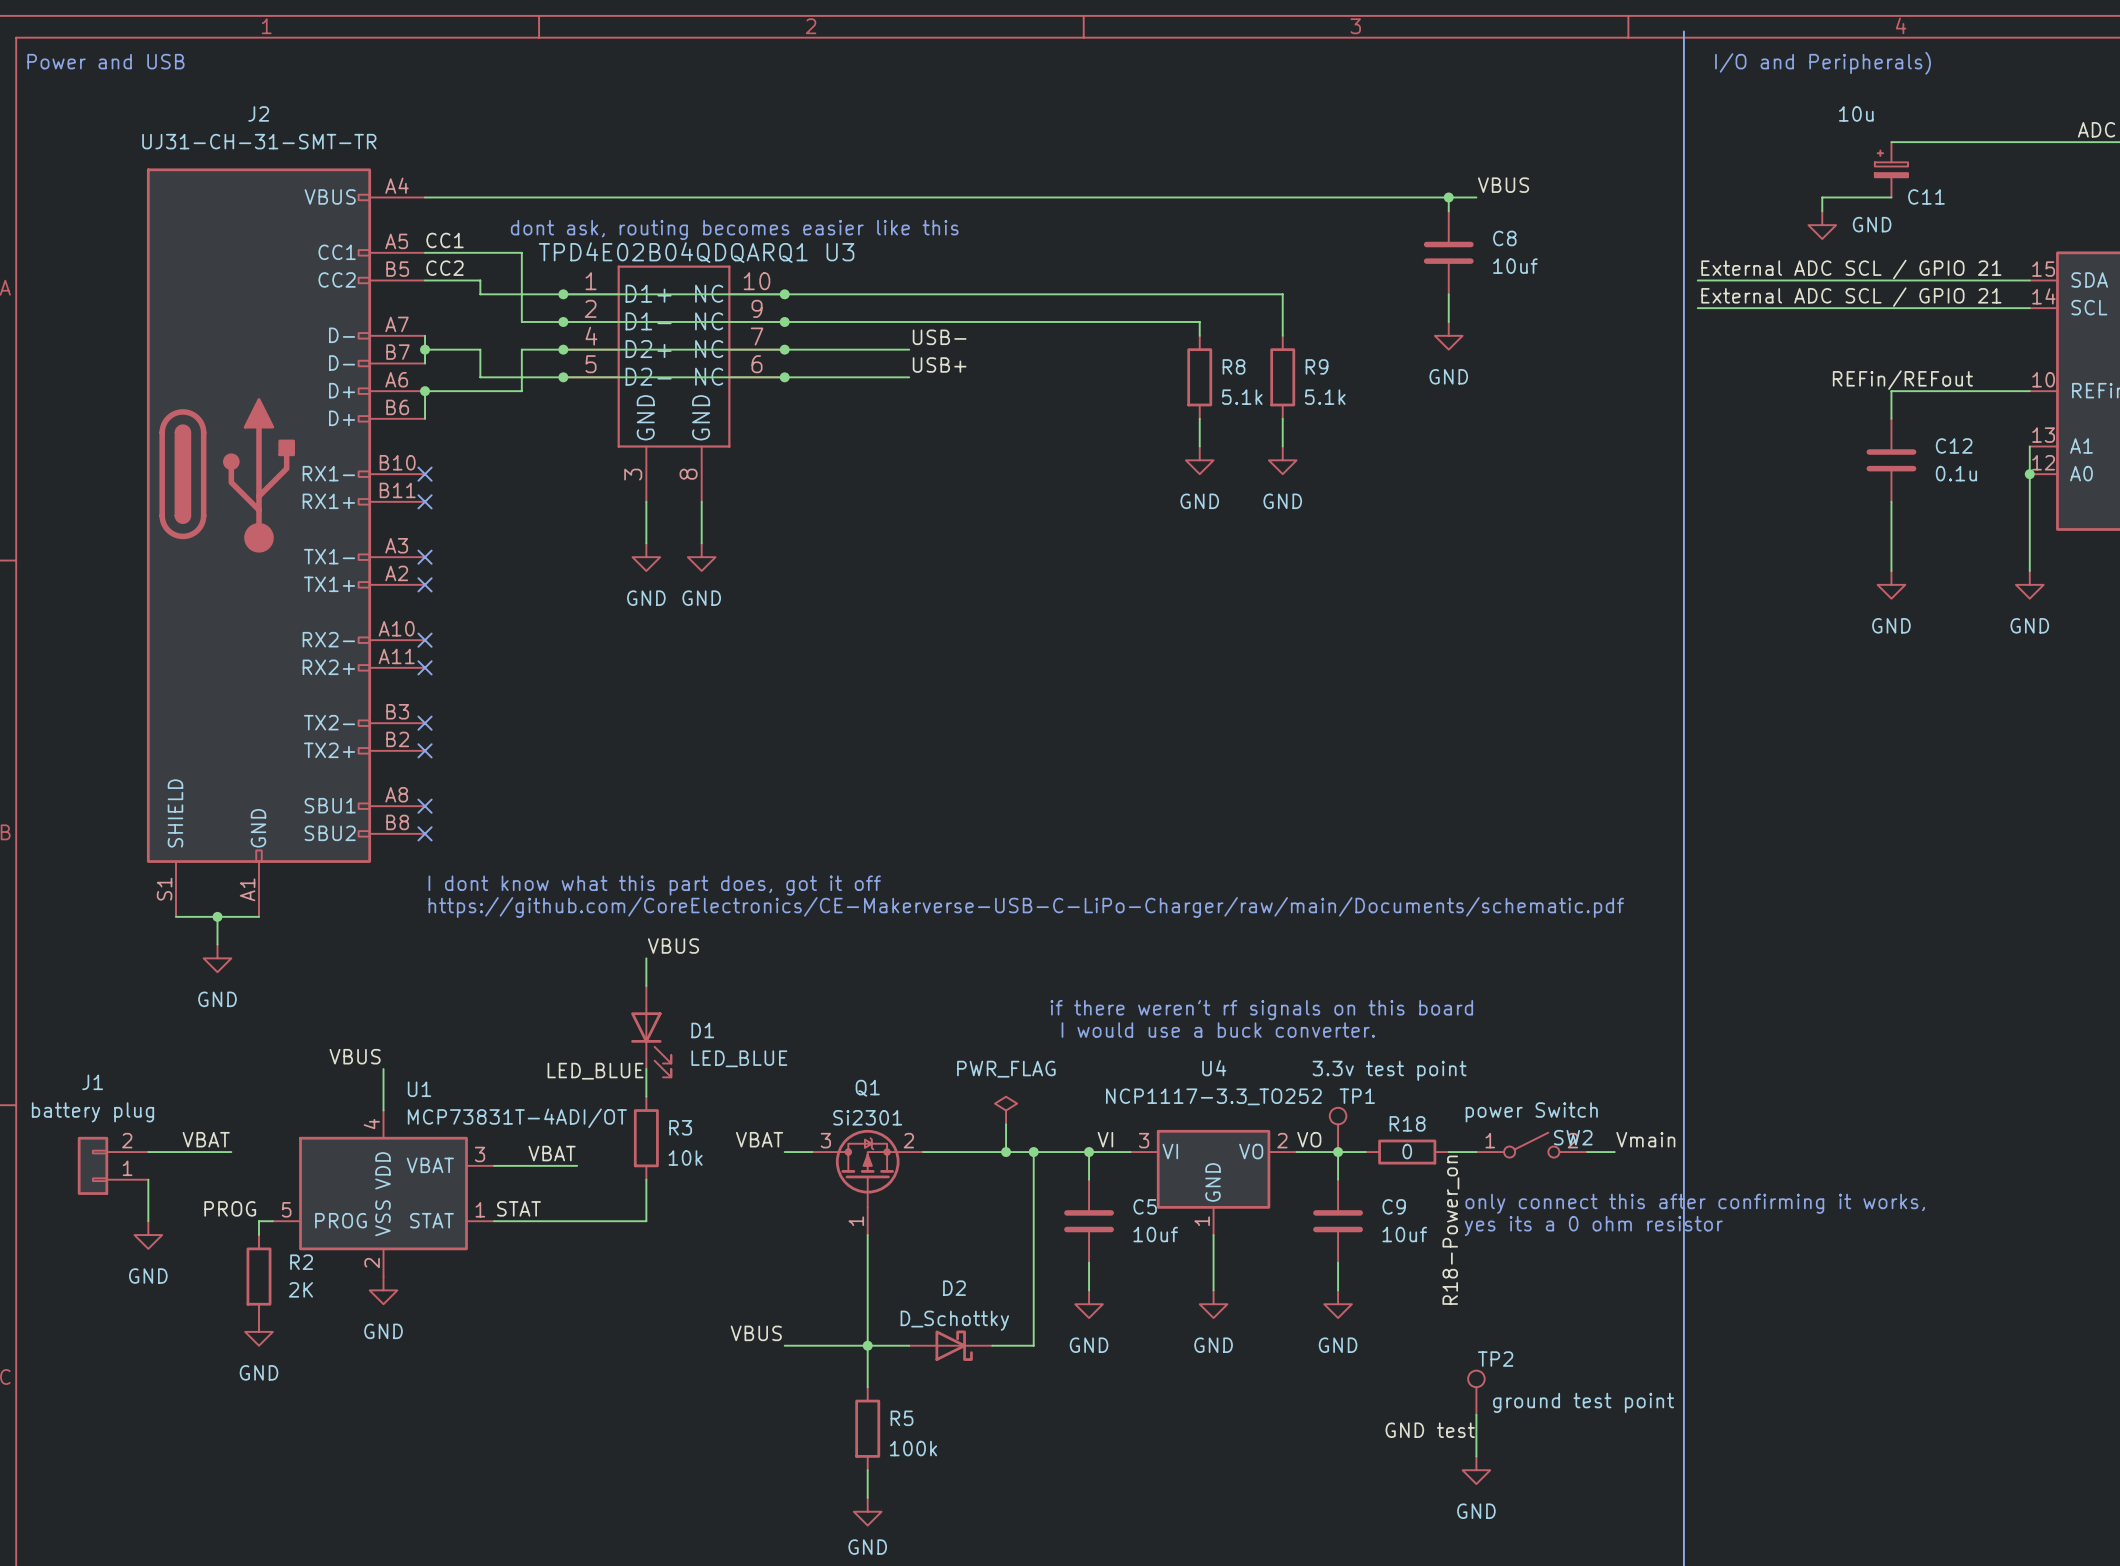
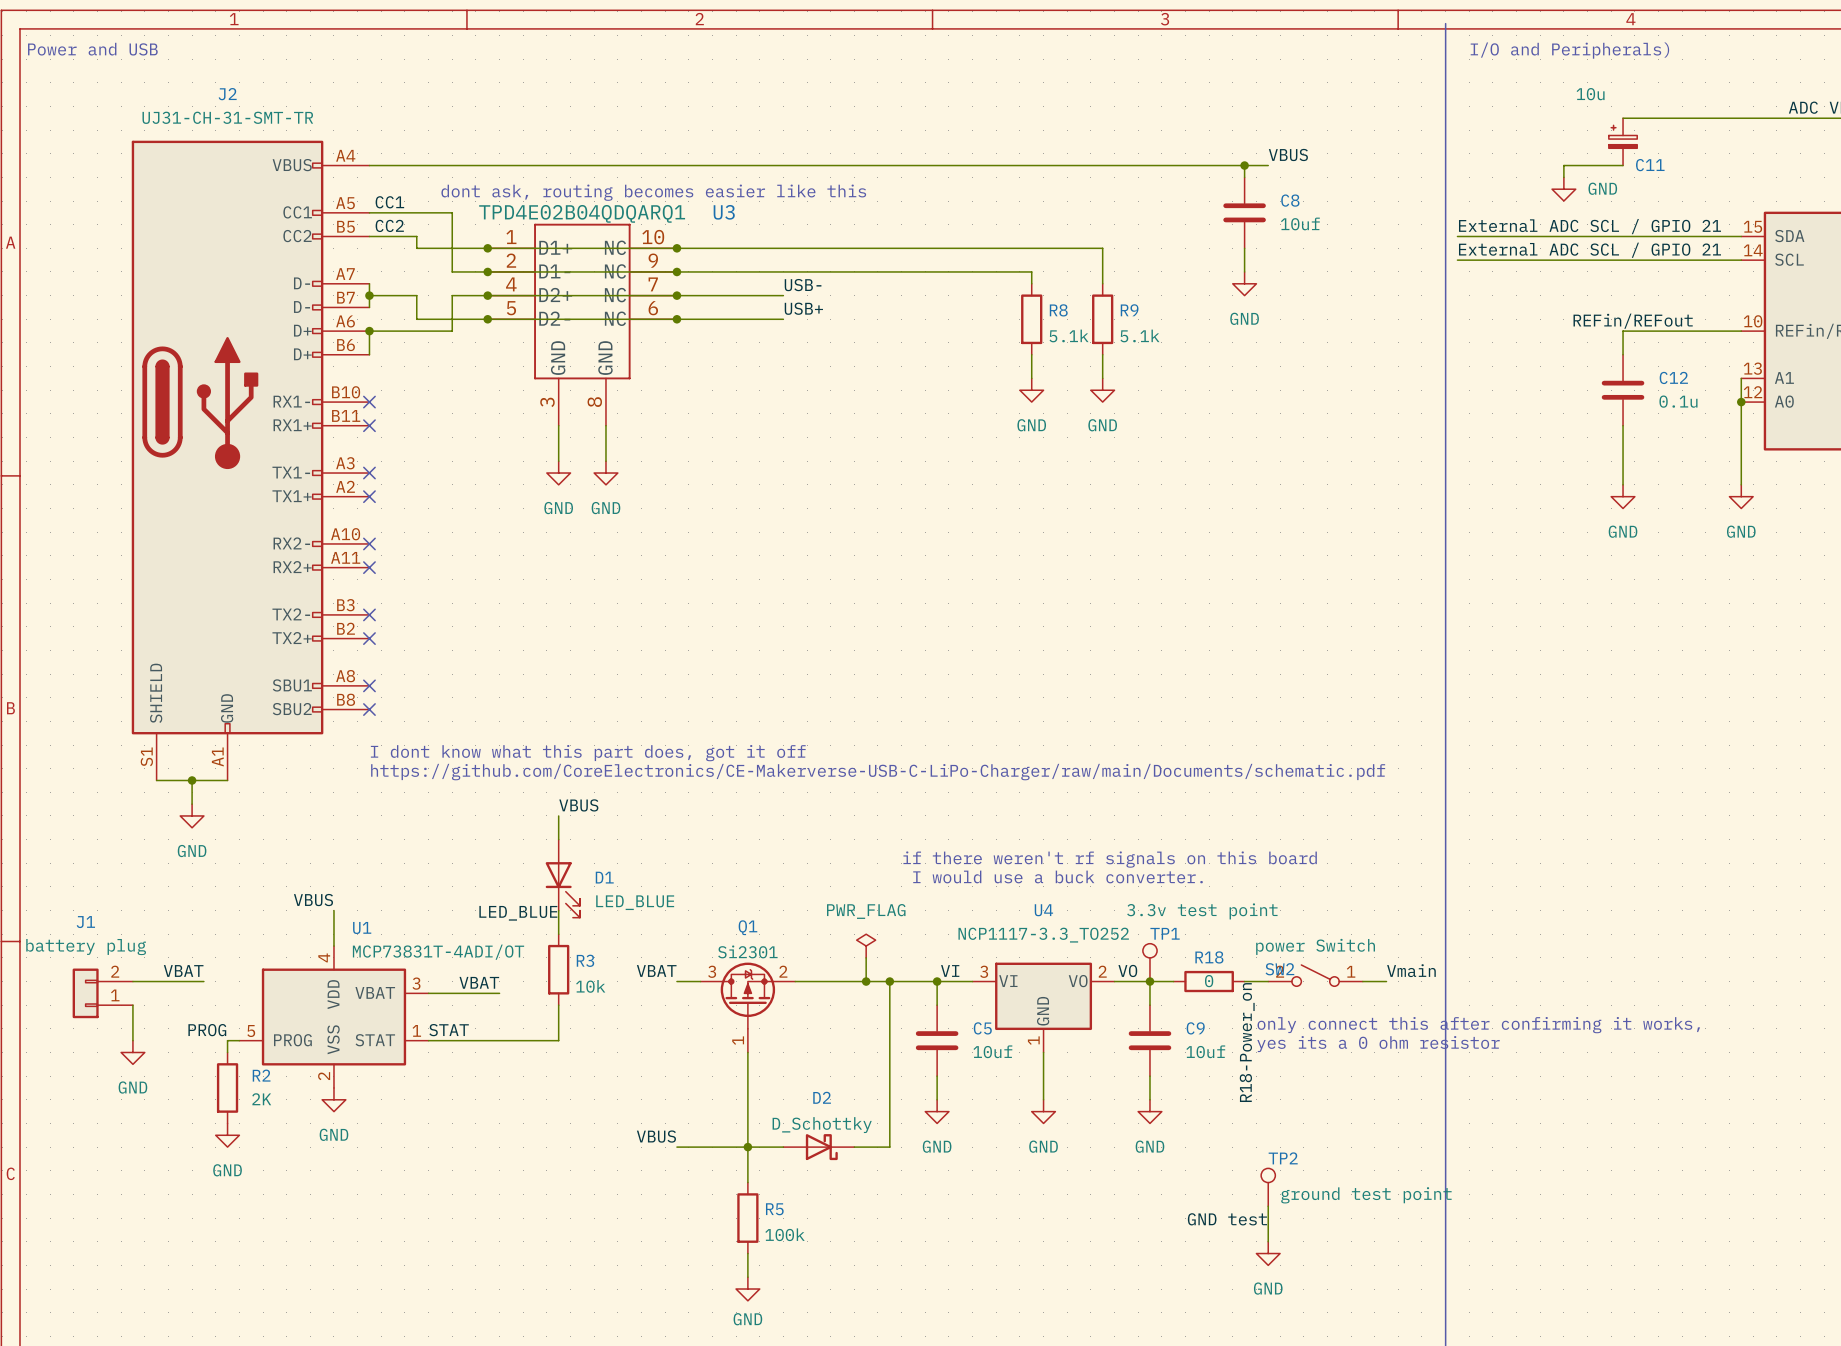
SW2 flip: as is (1531, 1145) -> left-right (1315, 975)

